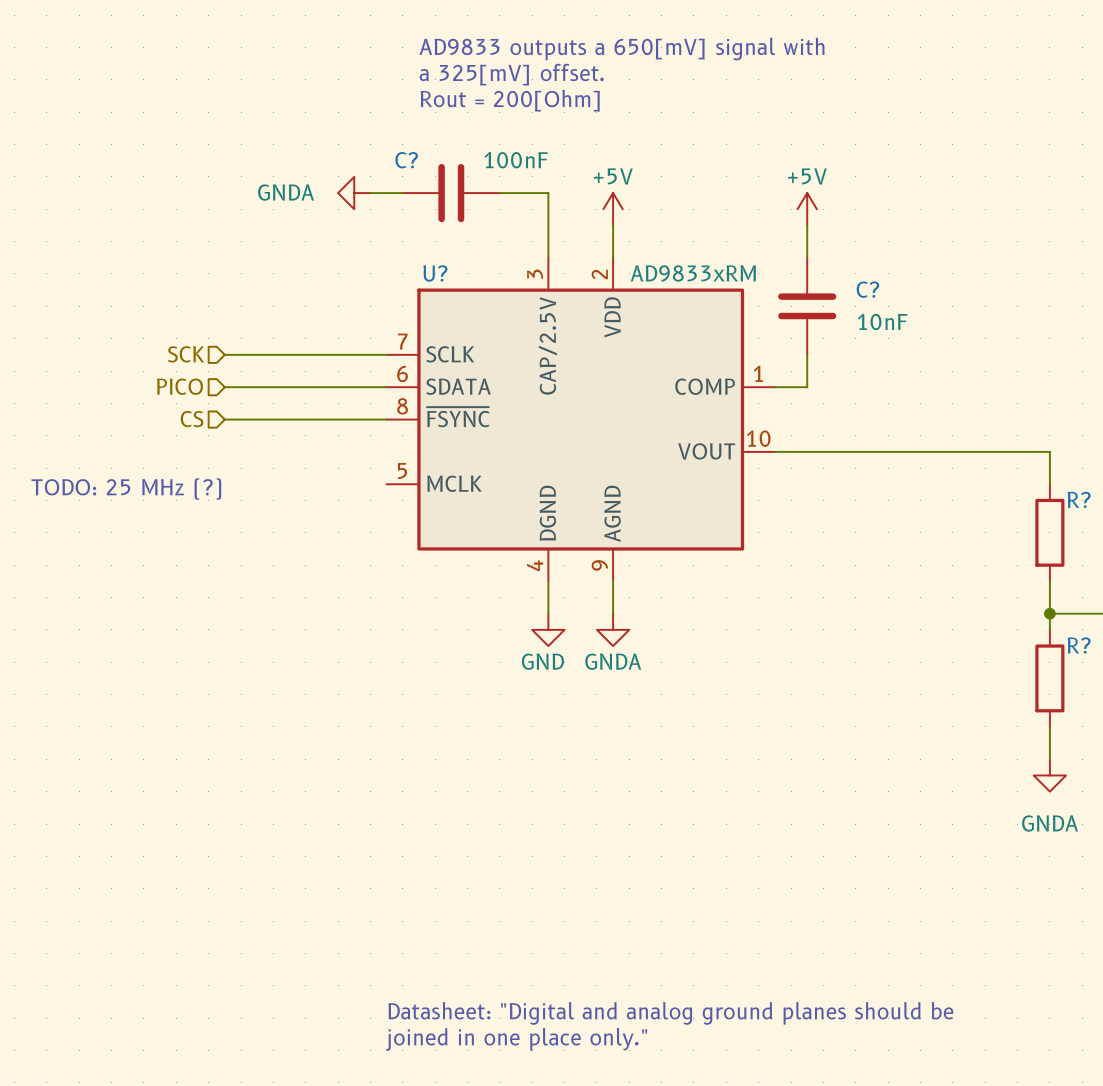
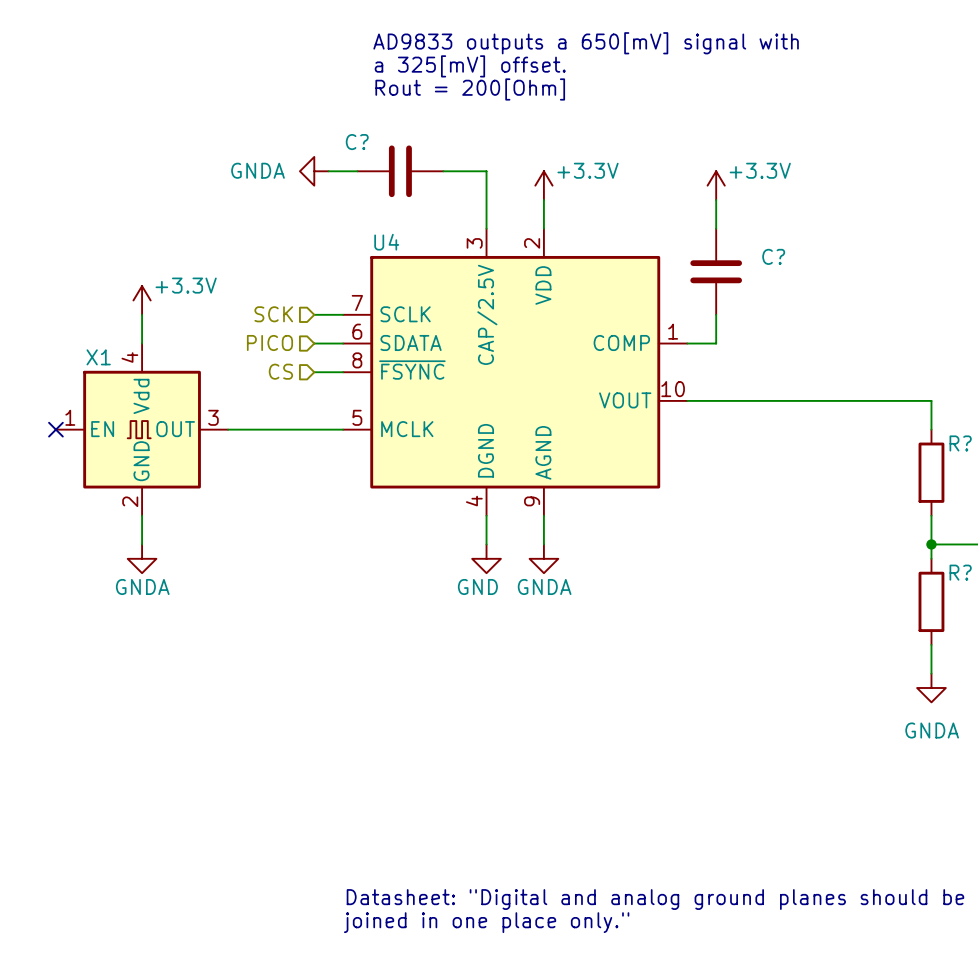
C? value: 100nF (516, 160) -> none
power symbol: +5V (613, 209) -> +3.3V (543, 185)
power symbol: +5V (807, 209) -> +3.3V (716, 185)
U? name: U? (435, 273) -> U4 (386, 242)
U? value: AD9833xRM (693, 273) -> none
C? value: 10nF (882, 321) -> none
power symbol: none -> +3.3V (142, 300)
wire: none -> (142, 314) (142, 343)
hierarchical label position: SCK (186, 354) -> SCK (273, 314)
wire: (224, 354) (354, 354) -> none
hierarchical label position: PICO (179, 386) -> PICO (269, 342)
wire: (224, 387) (354, 387) -> none
hierarchical label position: CS (192, 419) -> CS (280, 371)
wire: (224, 419) (354, 419) -> (228, 429) (343, 429)
no-connect mark: none -> (55, 429)
X1: none -> (142, 429)
text: TODO: 25 MHz (?) (126, 489) -> none
wire: none -> (142, 515) (142, 544)
power symbol: none -> GNDA (142, 558)

